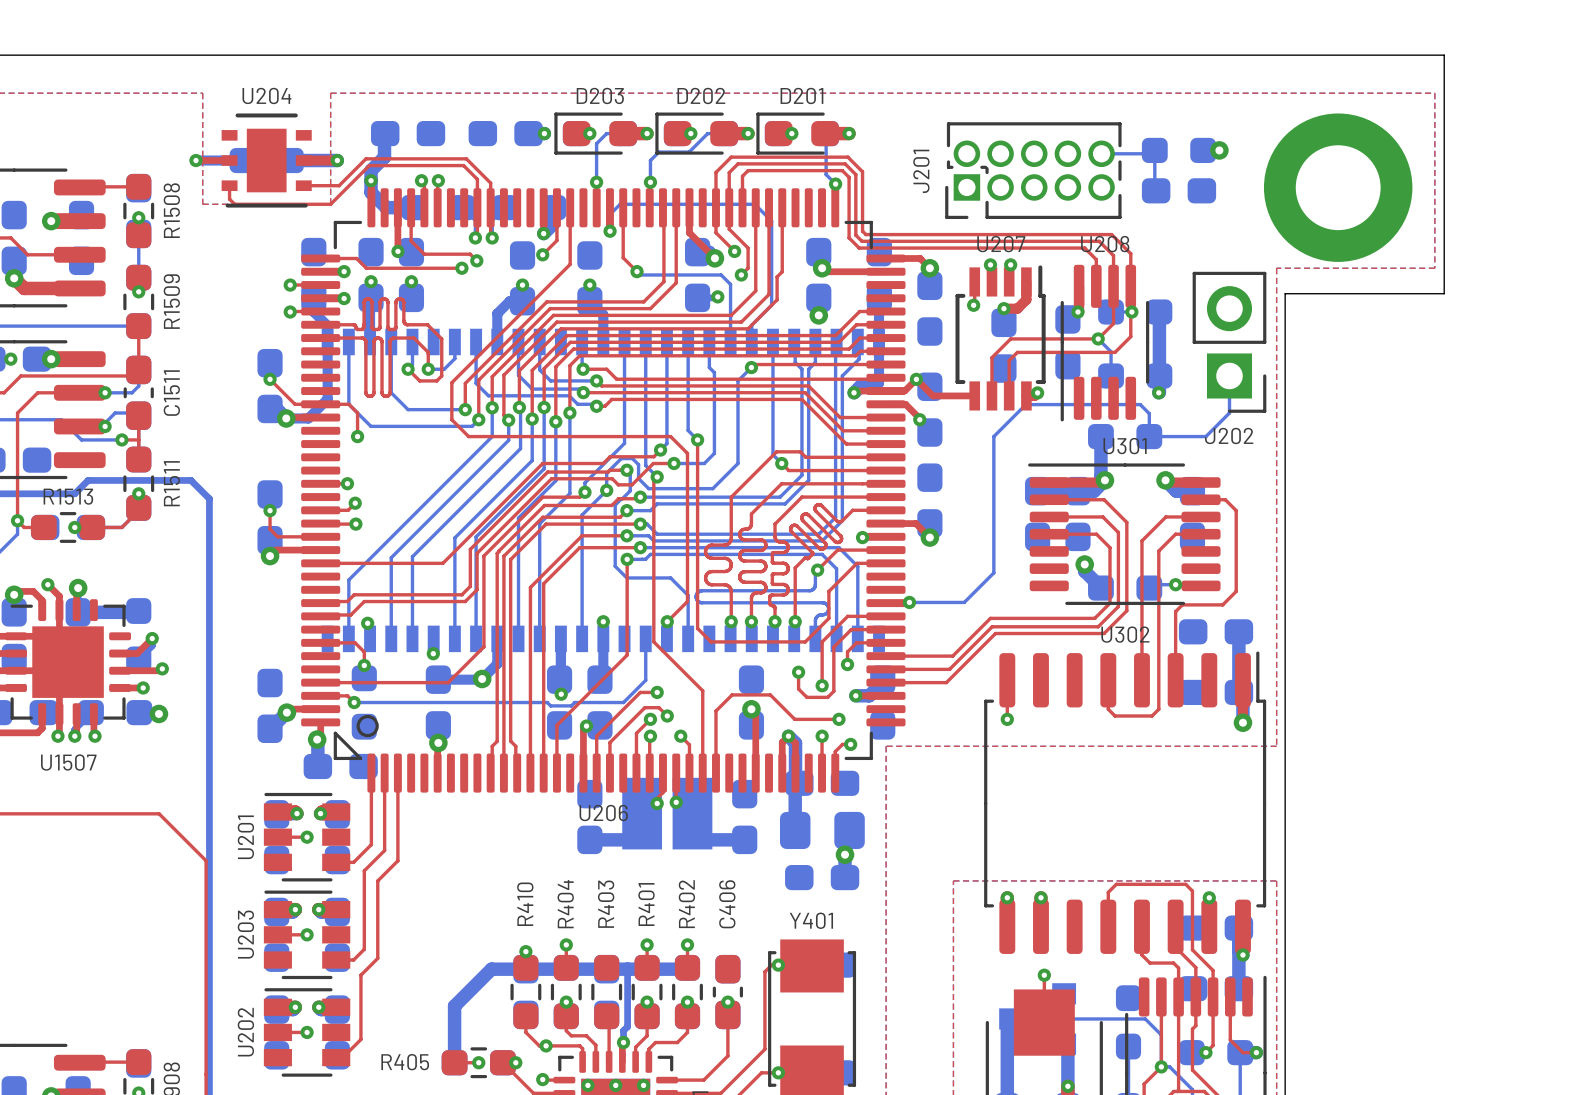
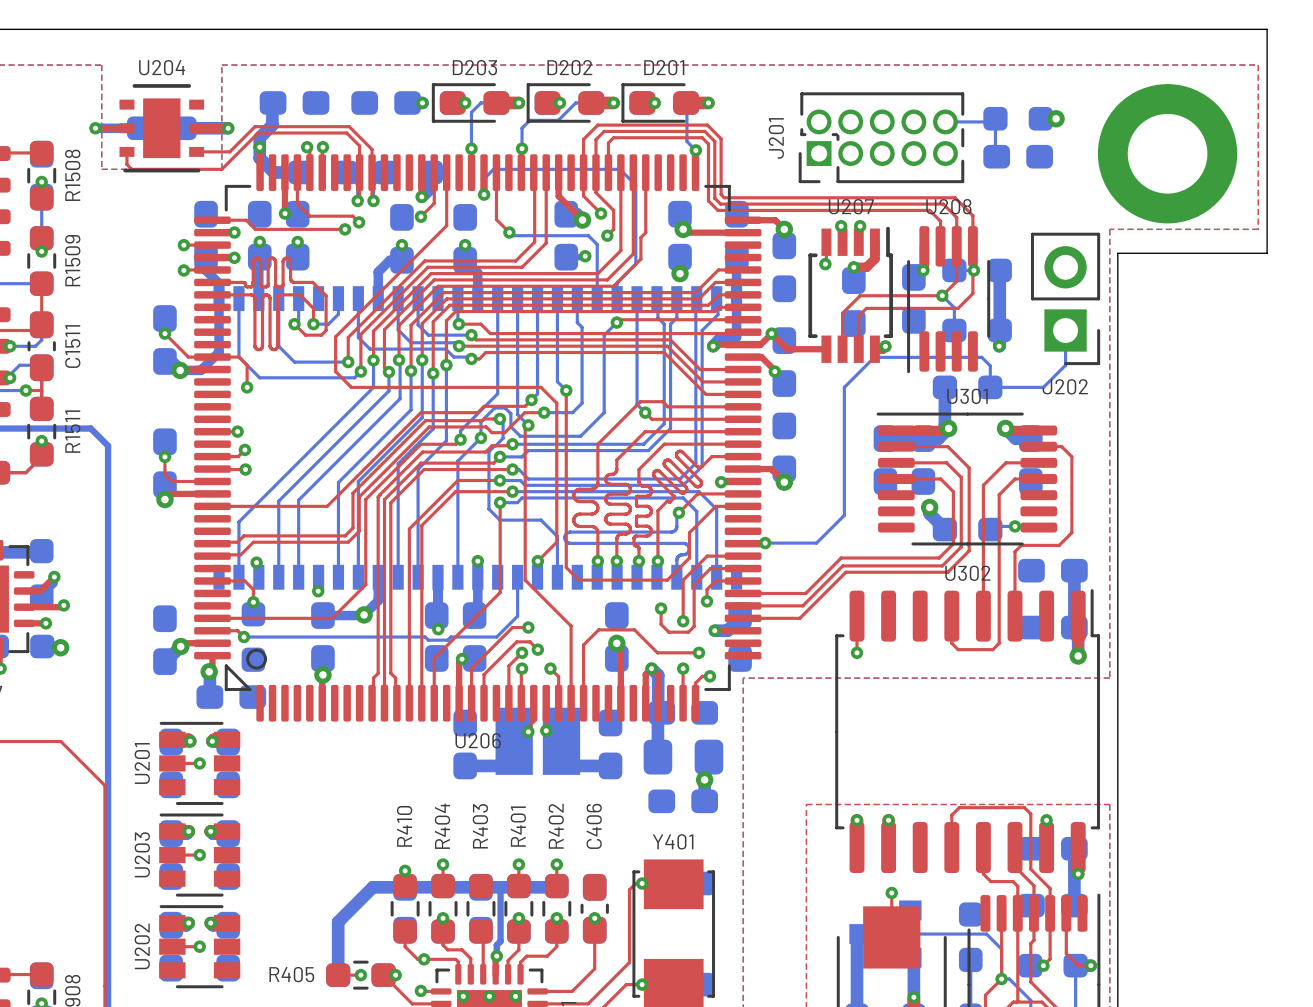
top track: (371, 773) (371, 844) (353, 862) (336, 862) -> none
top track: (384, 773) (384, 850) (364, 870) (364, 949) (353, 960) (336, 960) -> none
top track: (397, 773) (397, 860) (377, 880) (377, 958) (360, 975) (360, 1039) (342, 1057) (336, 1057) -> none

